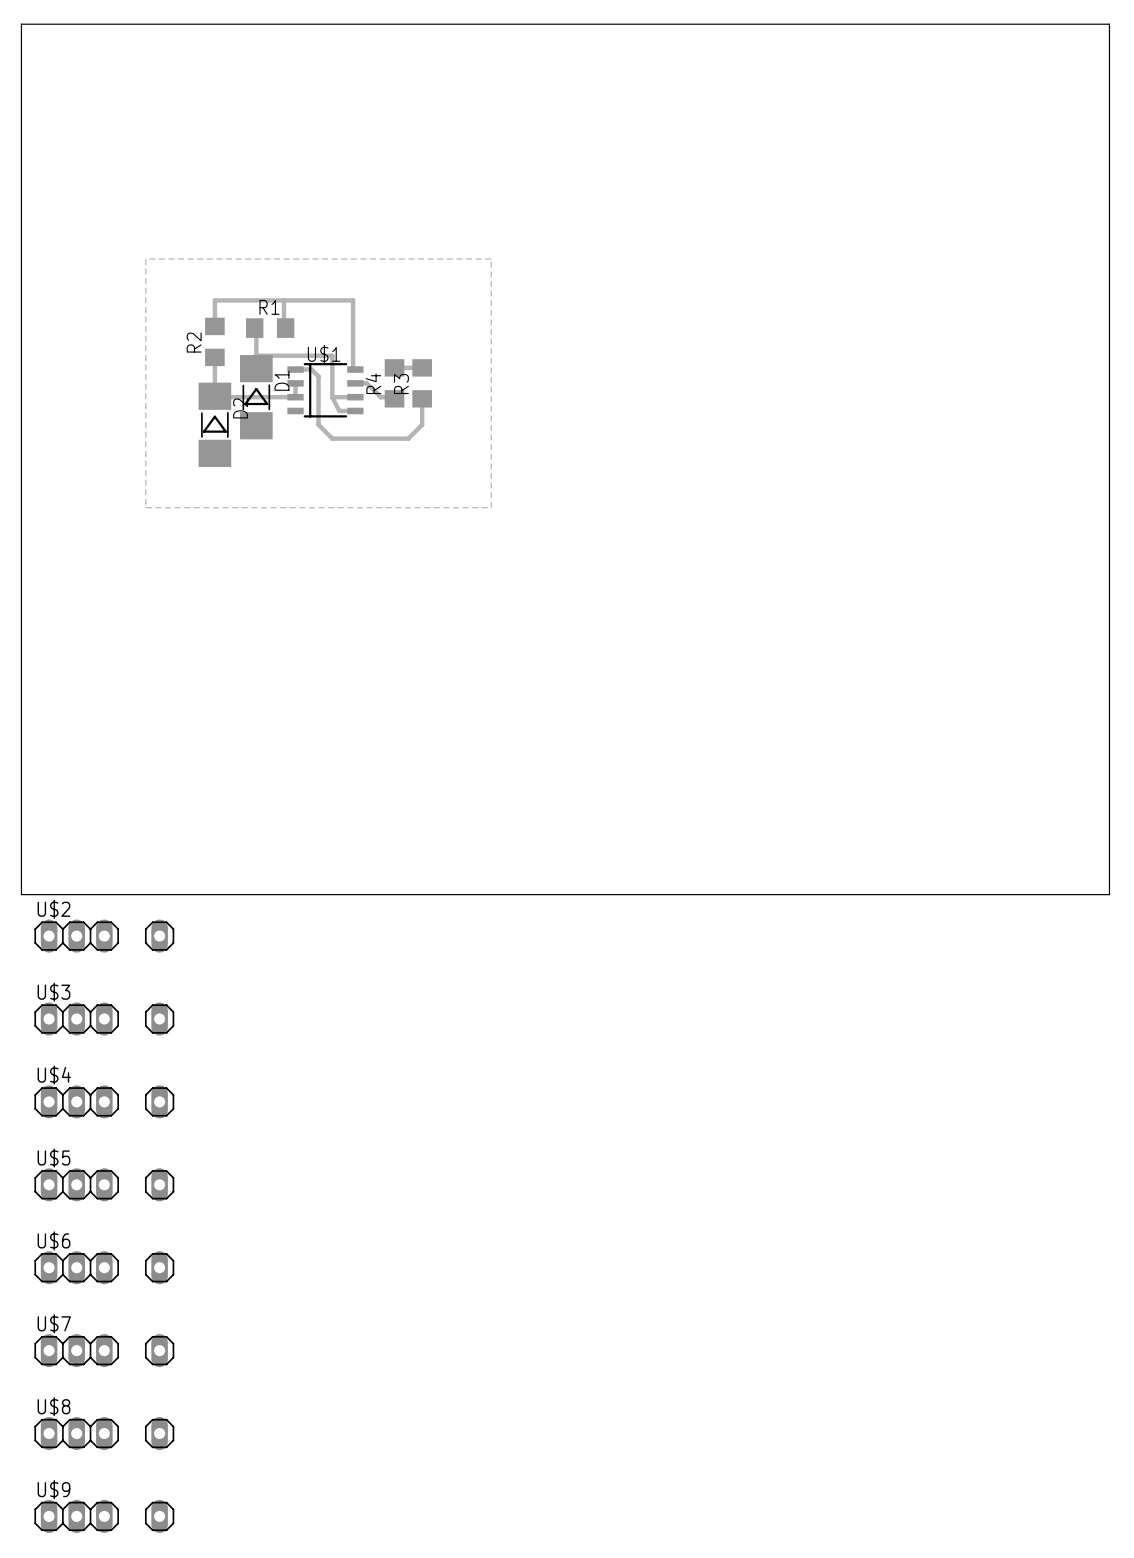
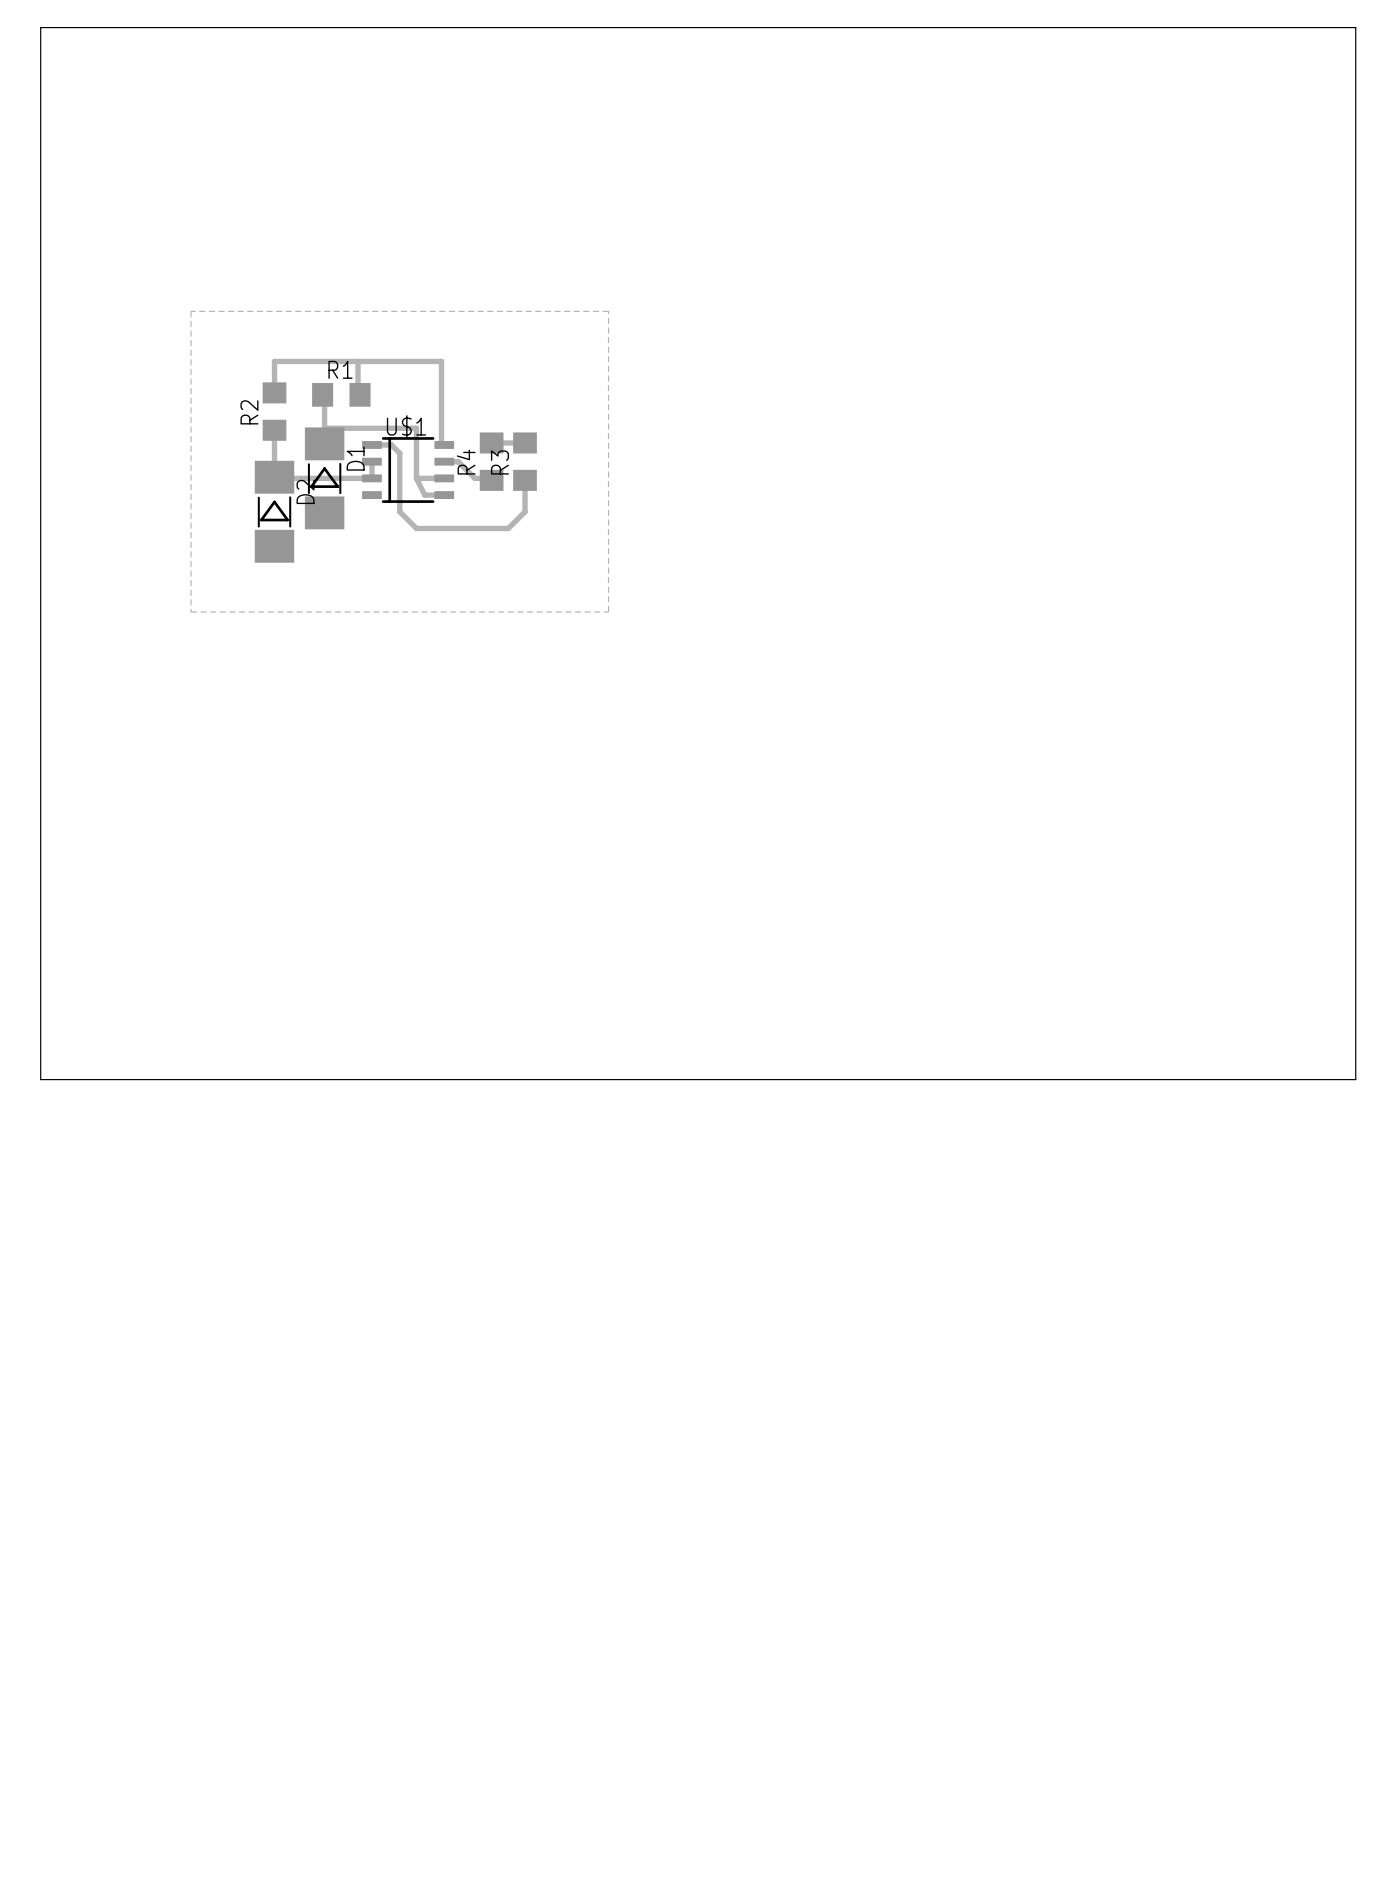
U$2: (104, 936) -> none
U$3: (104, 1018) -> none
U$4: (104, 1101) -> none
U$5: (104, 1184) -> none
U$6: (104, 1267) -> none
U$7: (104, 1350) -> none
U$8: (104, 1433) -> none
U$9: (104, 1516) -> none

